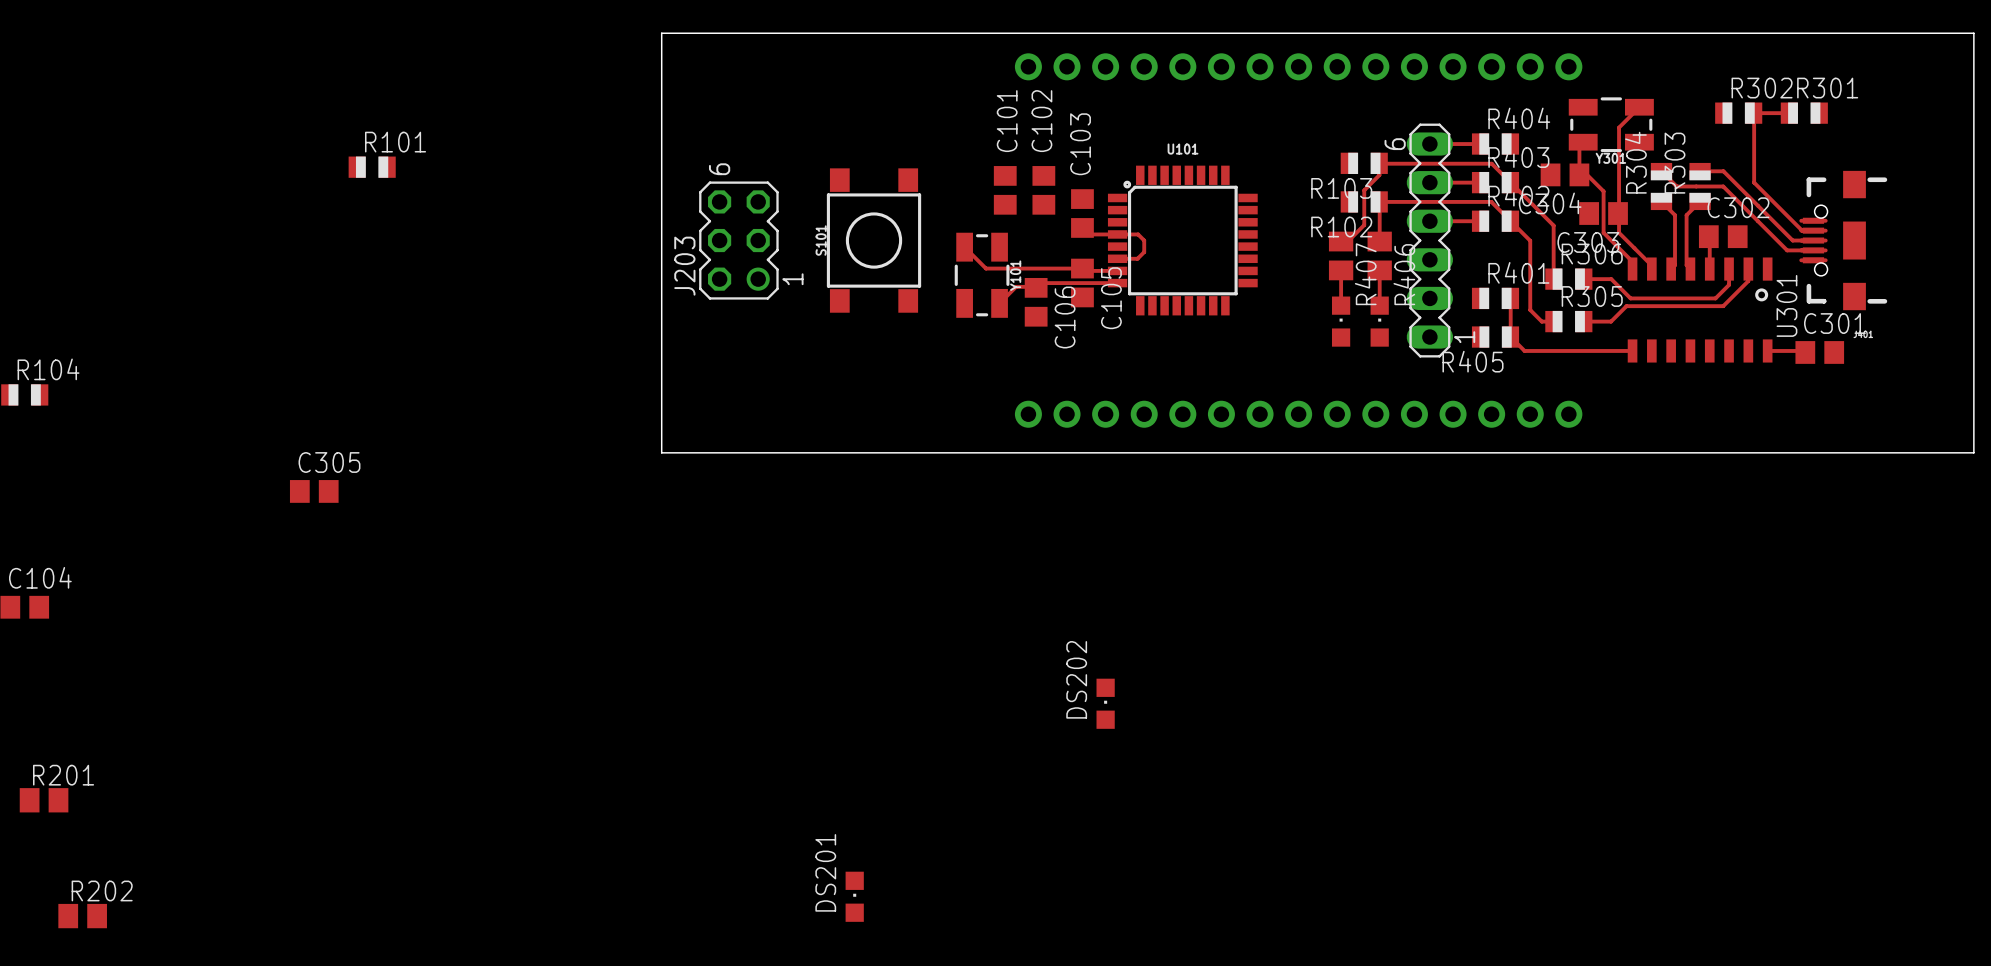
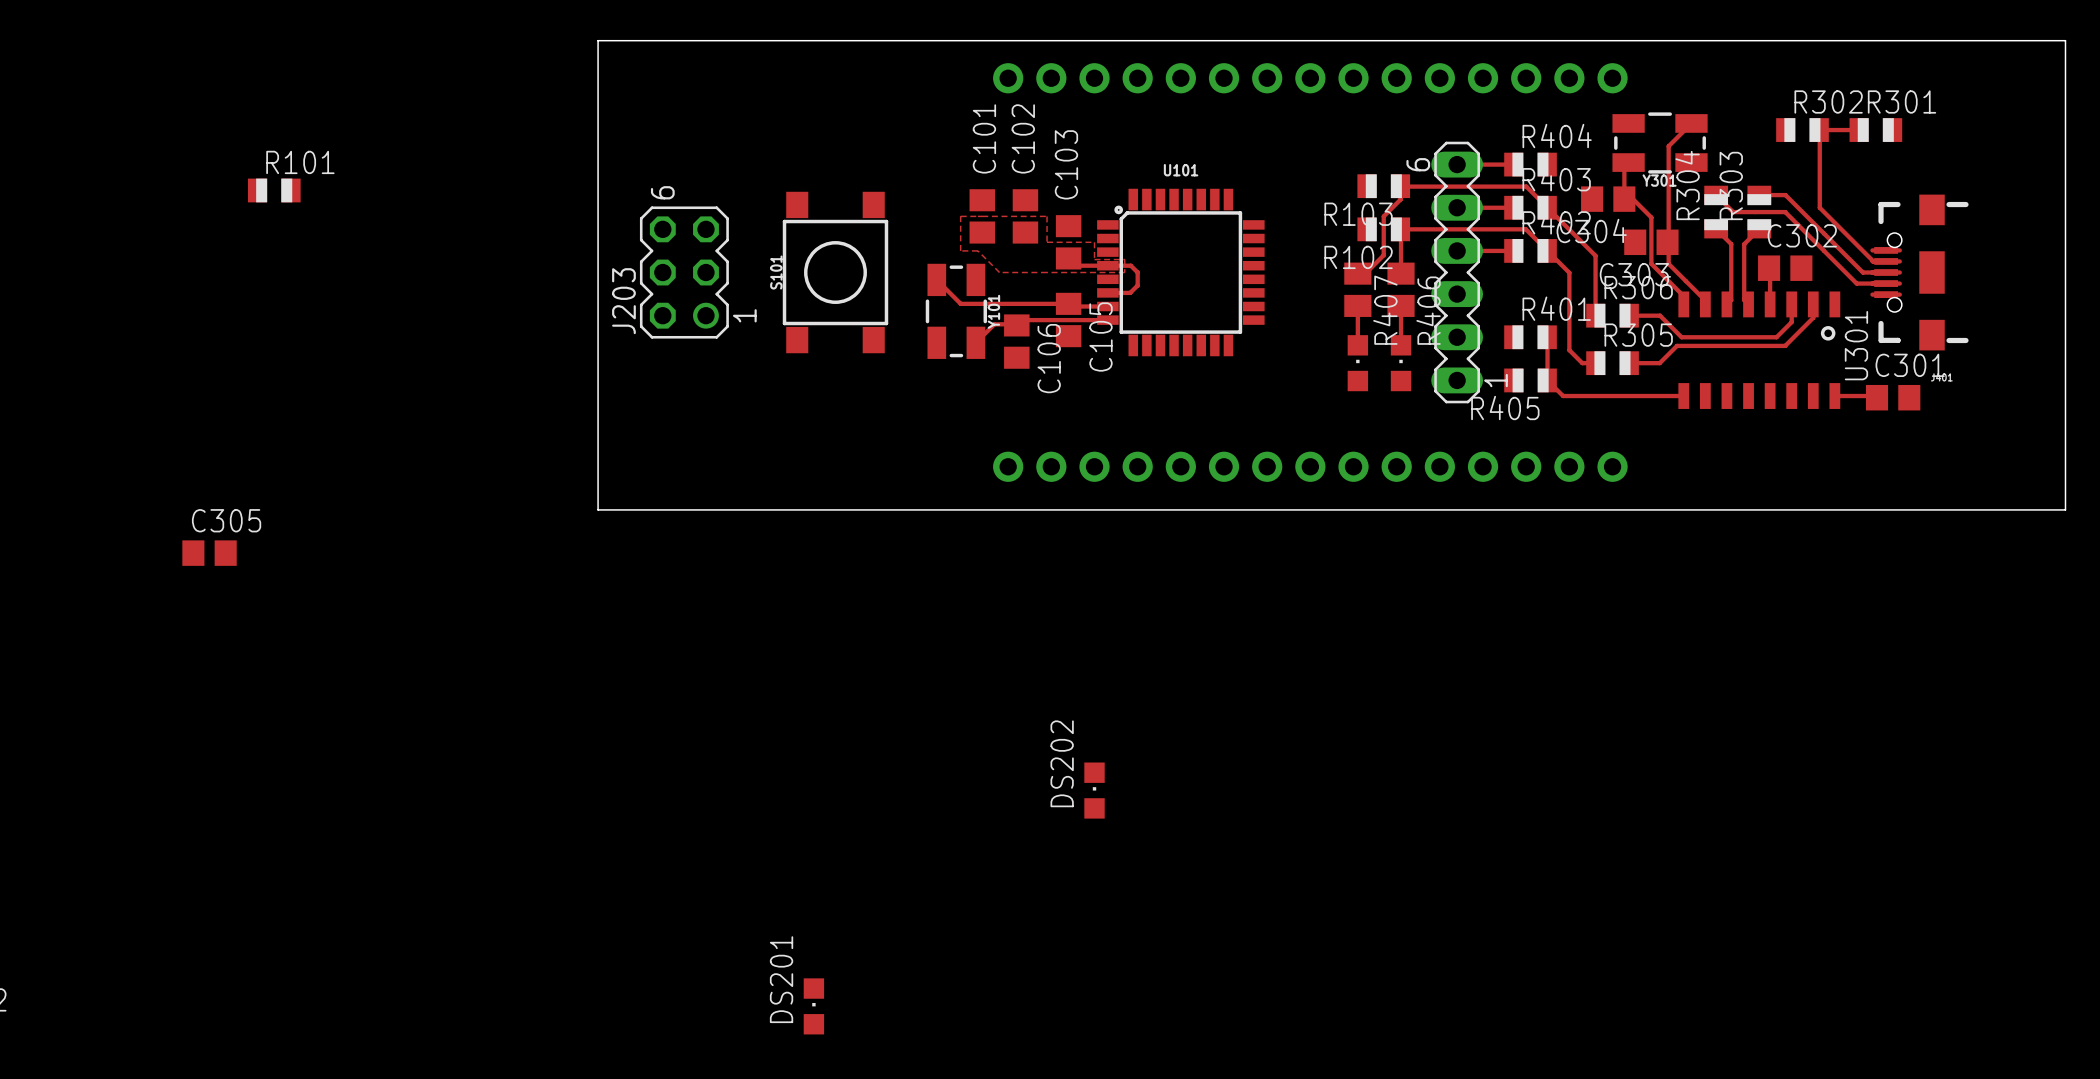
zone outline: none -> (960, 216) (1047, 216) (1047, 242) (1094, 242) (1094, 259) (1124, 259) (1124, 272) (999, 272) (977, 250) (960, 250) (960, 216)

